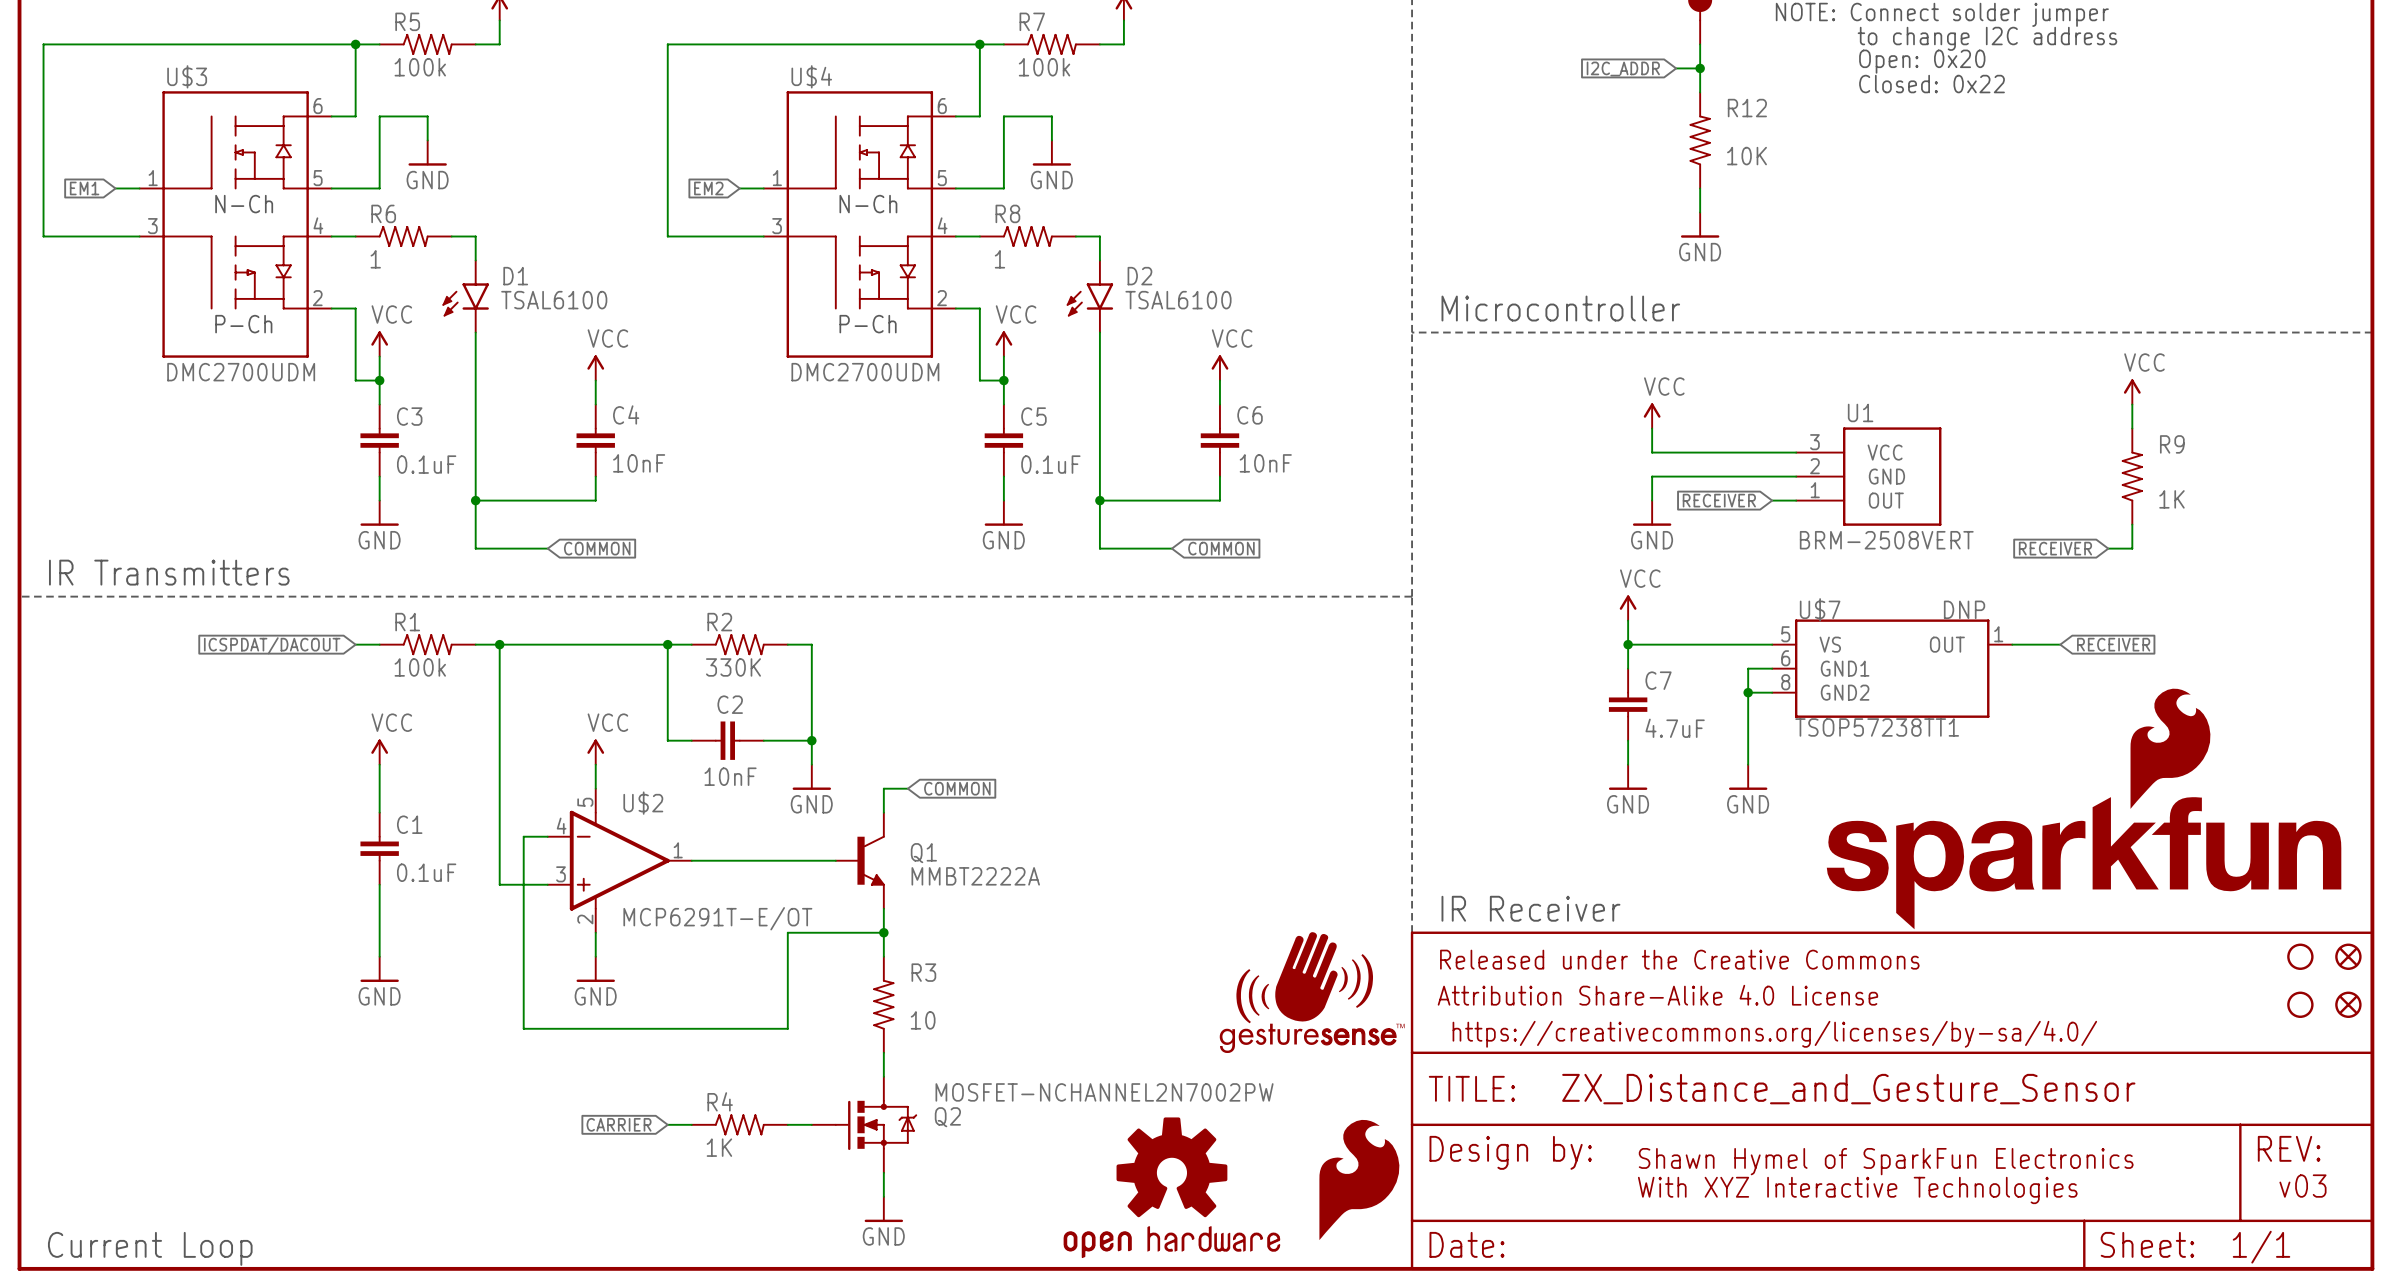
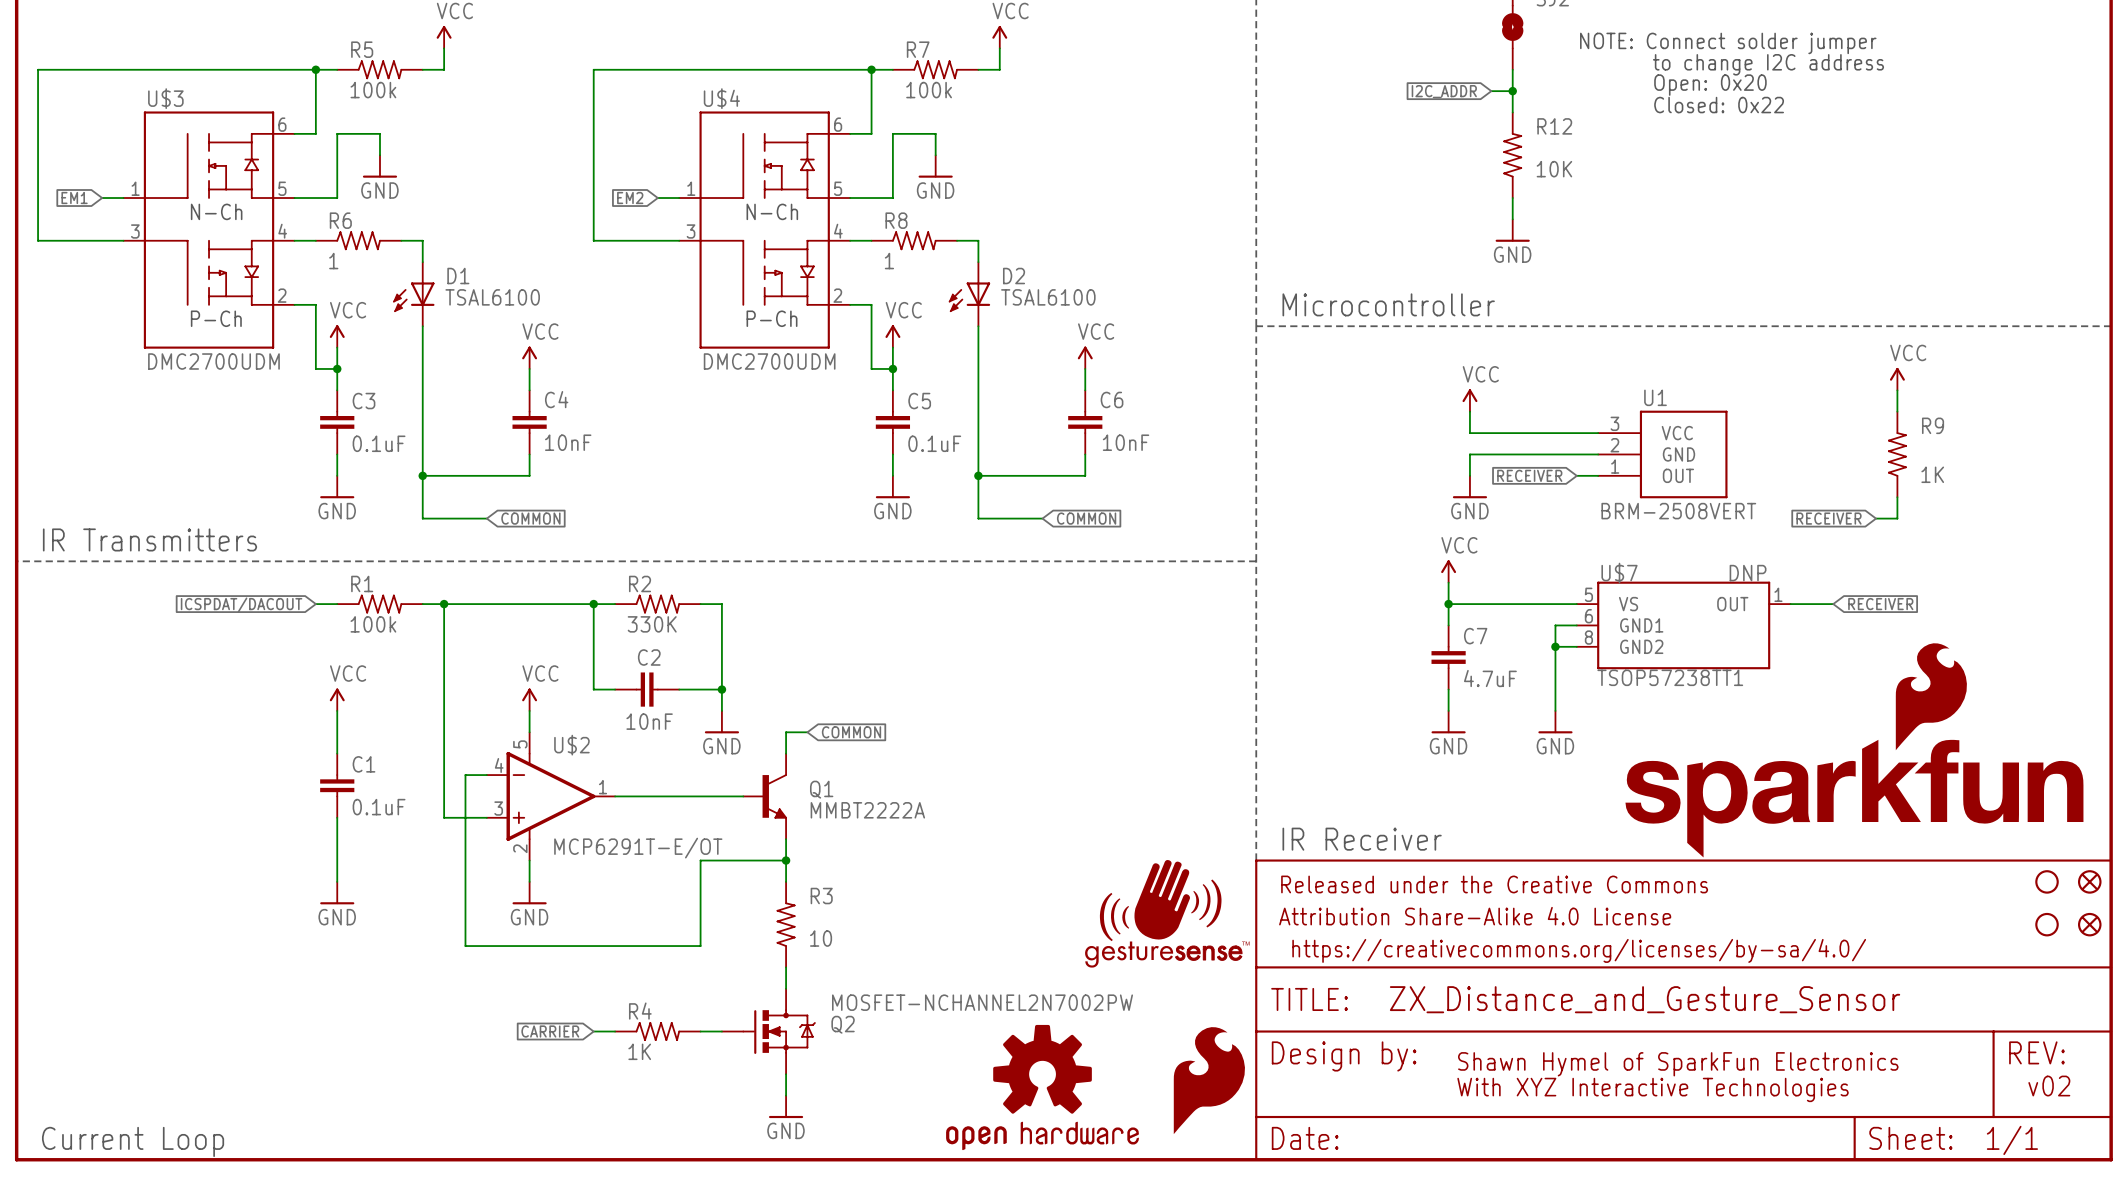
D1 symbol: [442, 260, 489, 333] -> [393, 262, 435, 327]
D2 symbol: [1066, 260, 1114, 333] -> [948, 262, 991, 327]
text: v03 (2302, 1186) -> v02 (2049, 1086)

